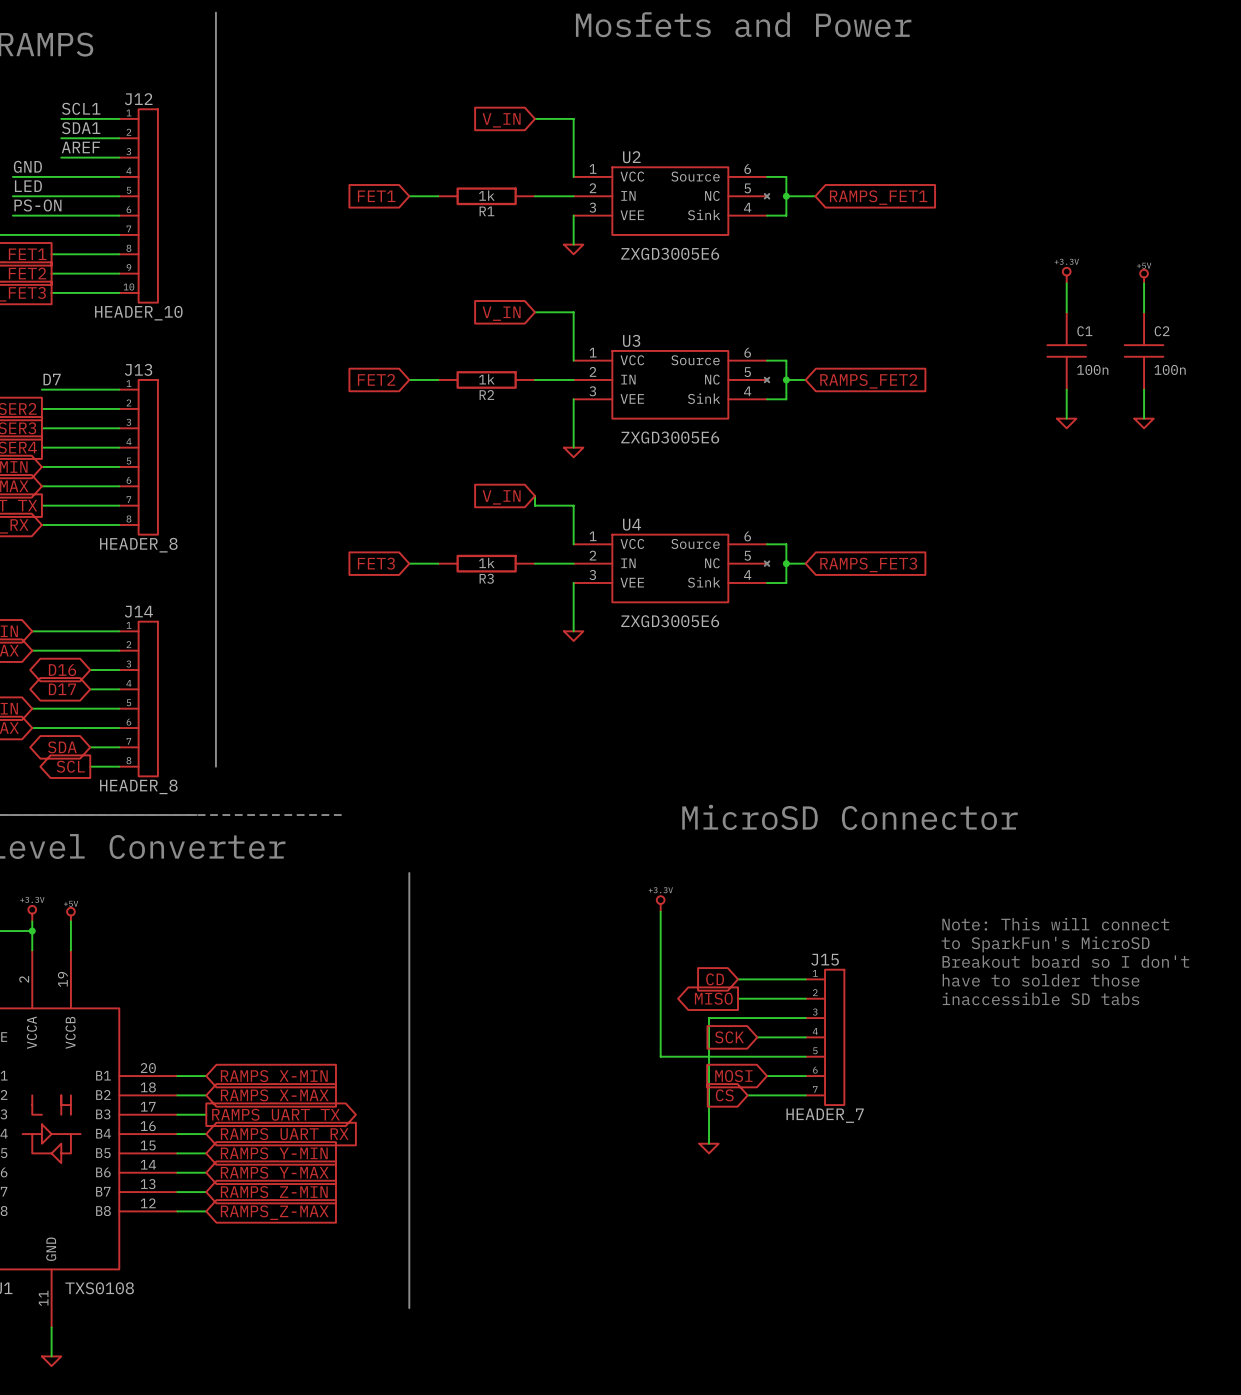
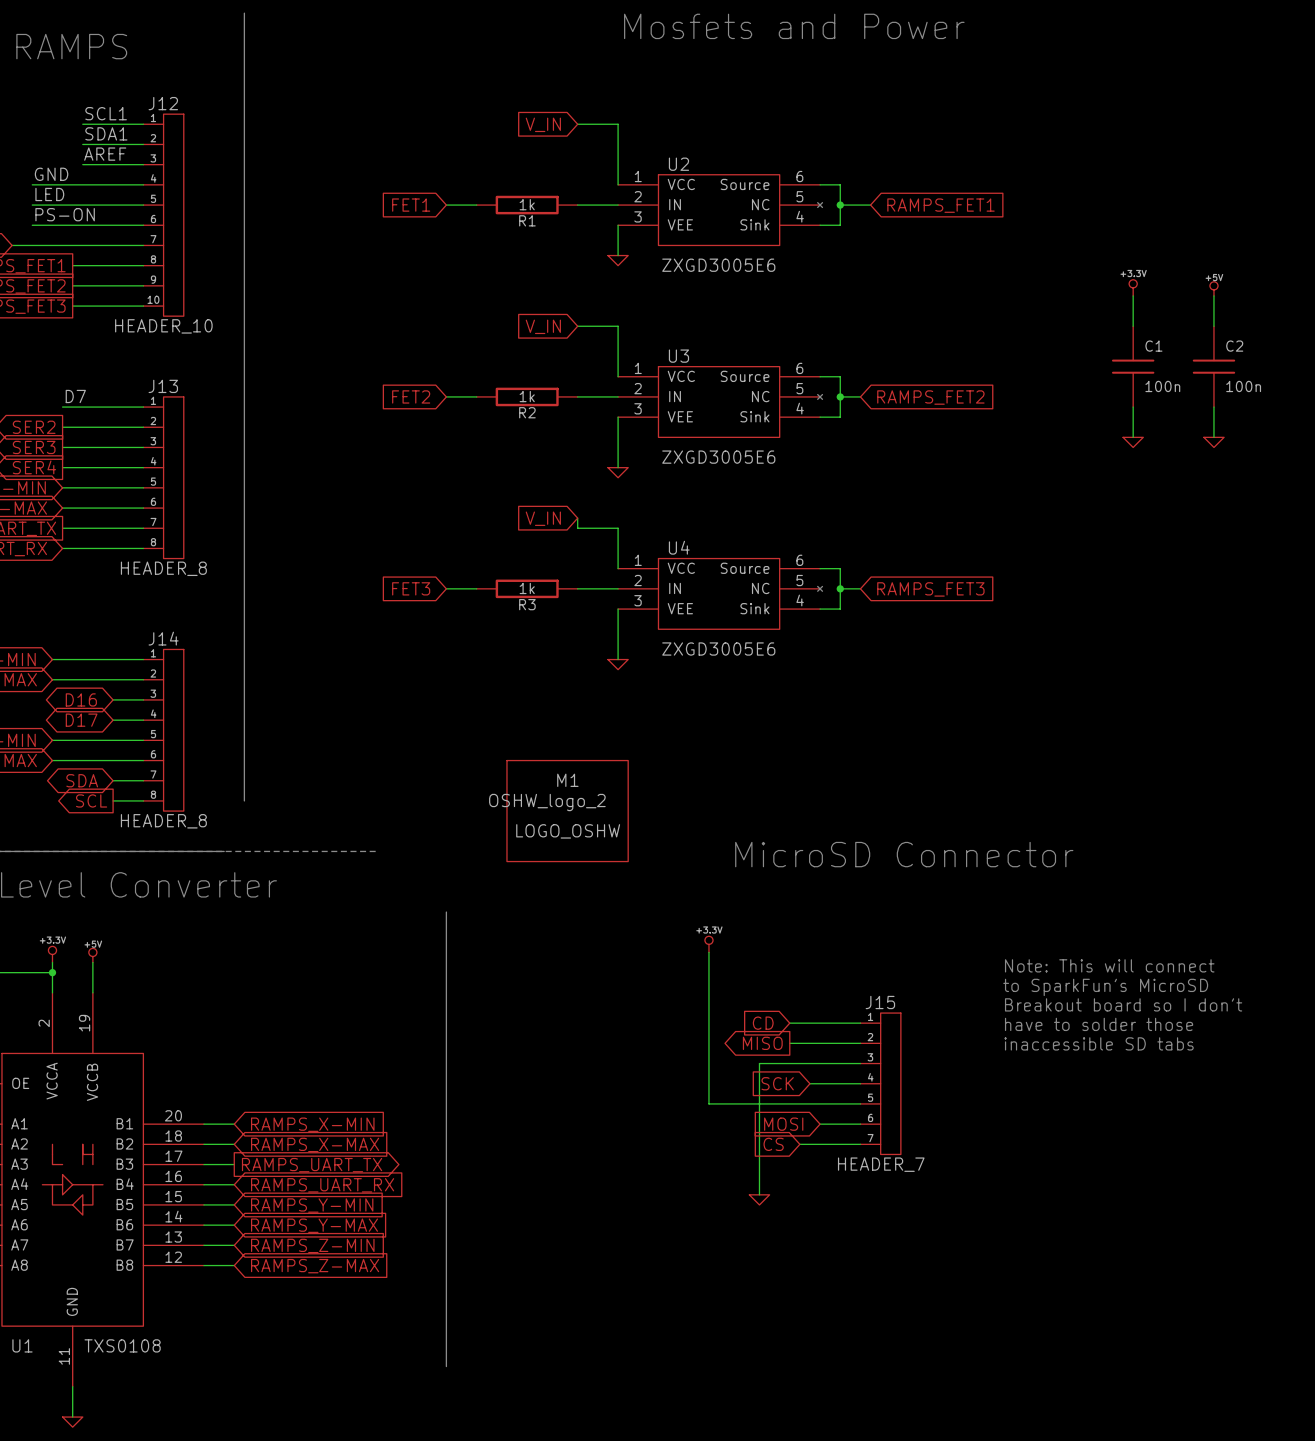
M1: none -> LOGO_OSHW (567, 811)

